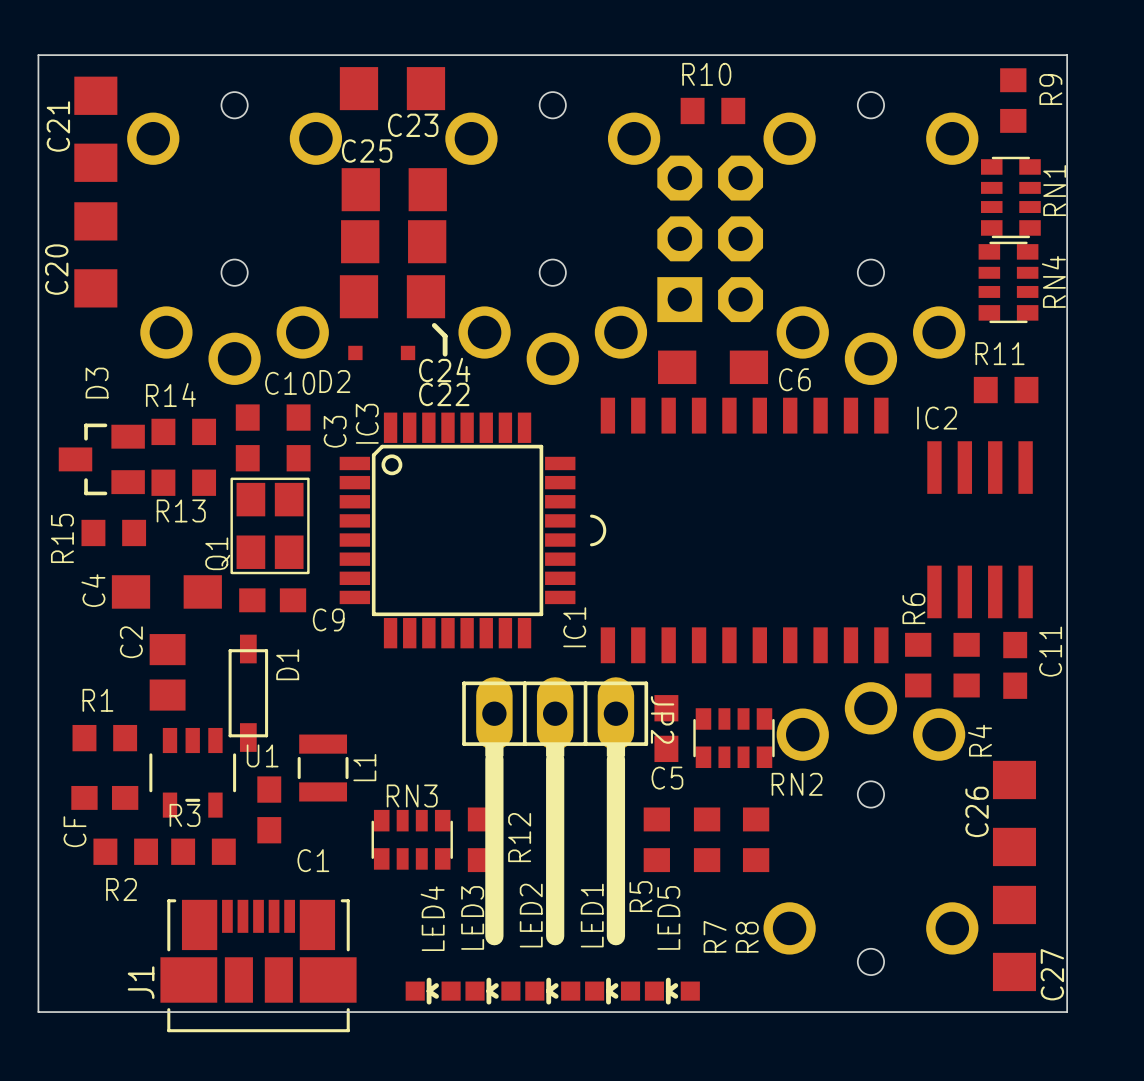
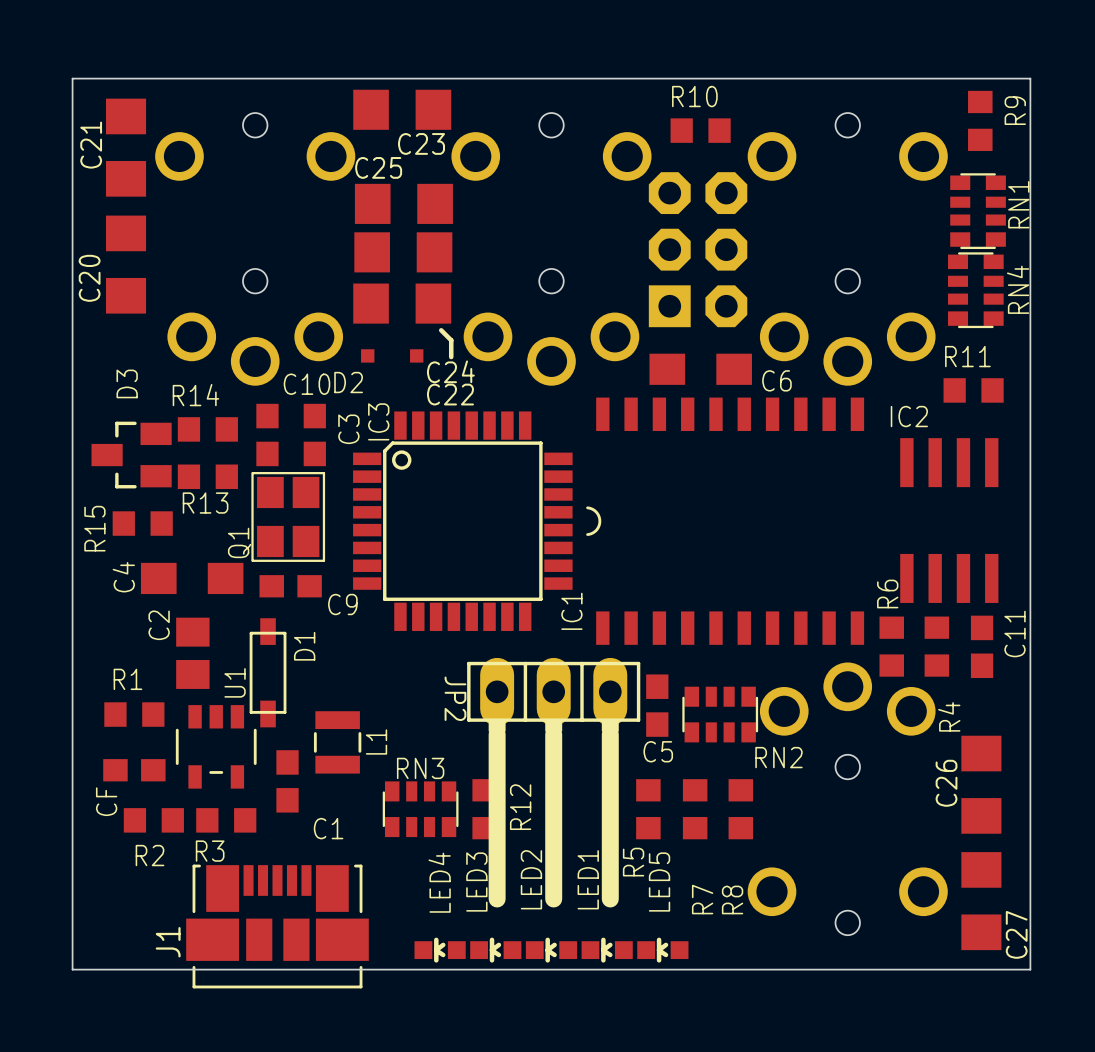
JP2 name position: JP2 (662, 719) -> JP2 (455, 698)
U1 name rotation: 0° (262, 755) -> 90° counterclockwise (235, 682)
U1 name position: U1 (262, 755) -> U1 (235, 682)
R3 name position: R3 (184, 815) -> R3 (210, 851)

